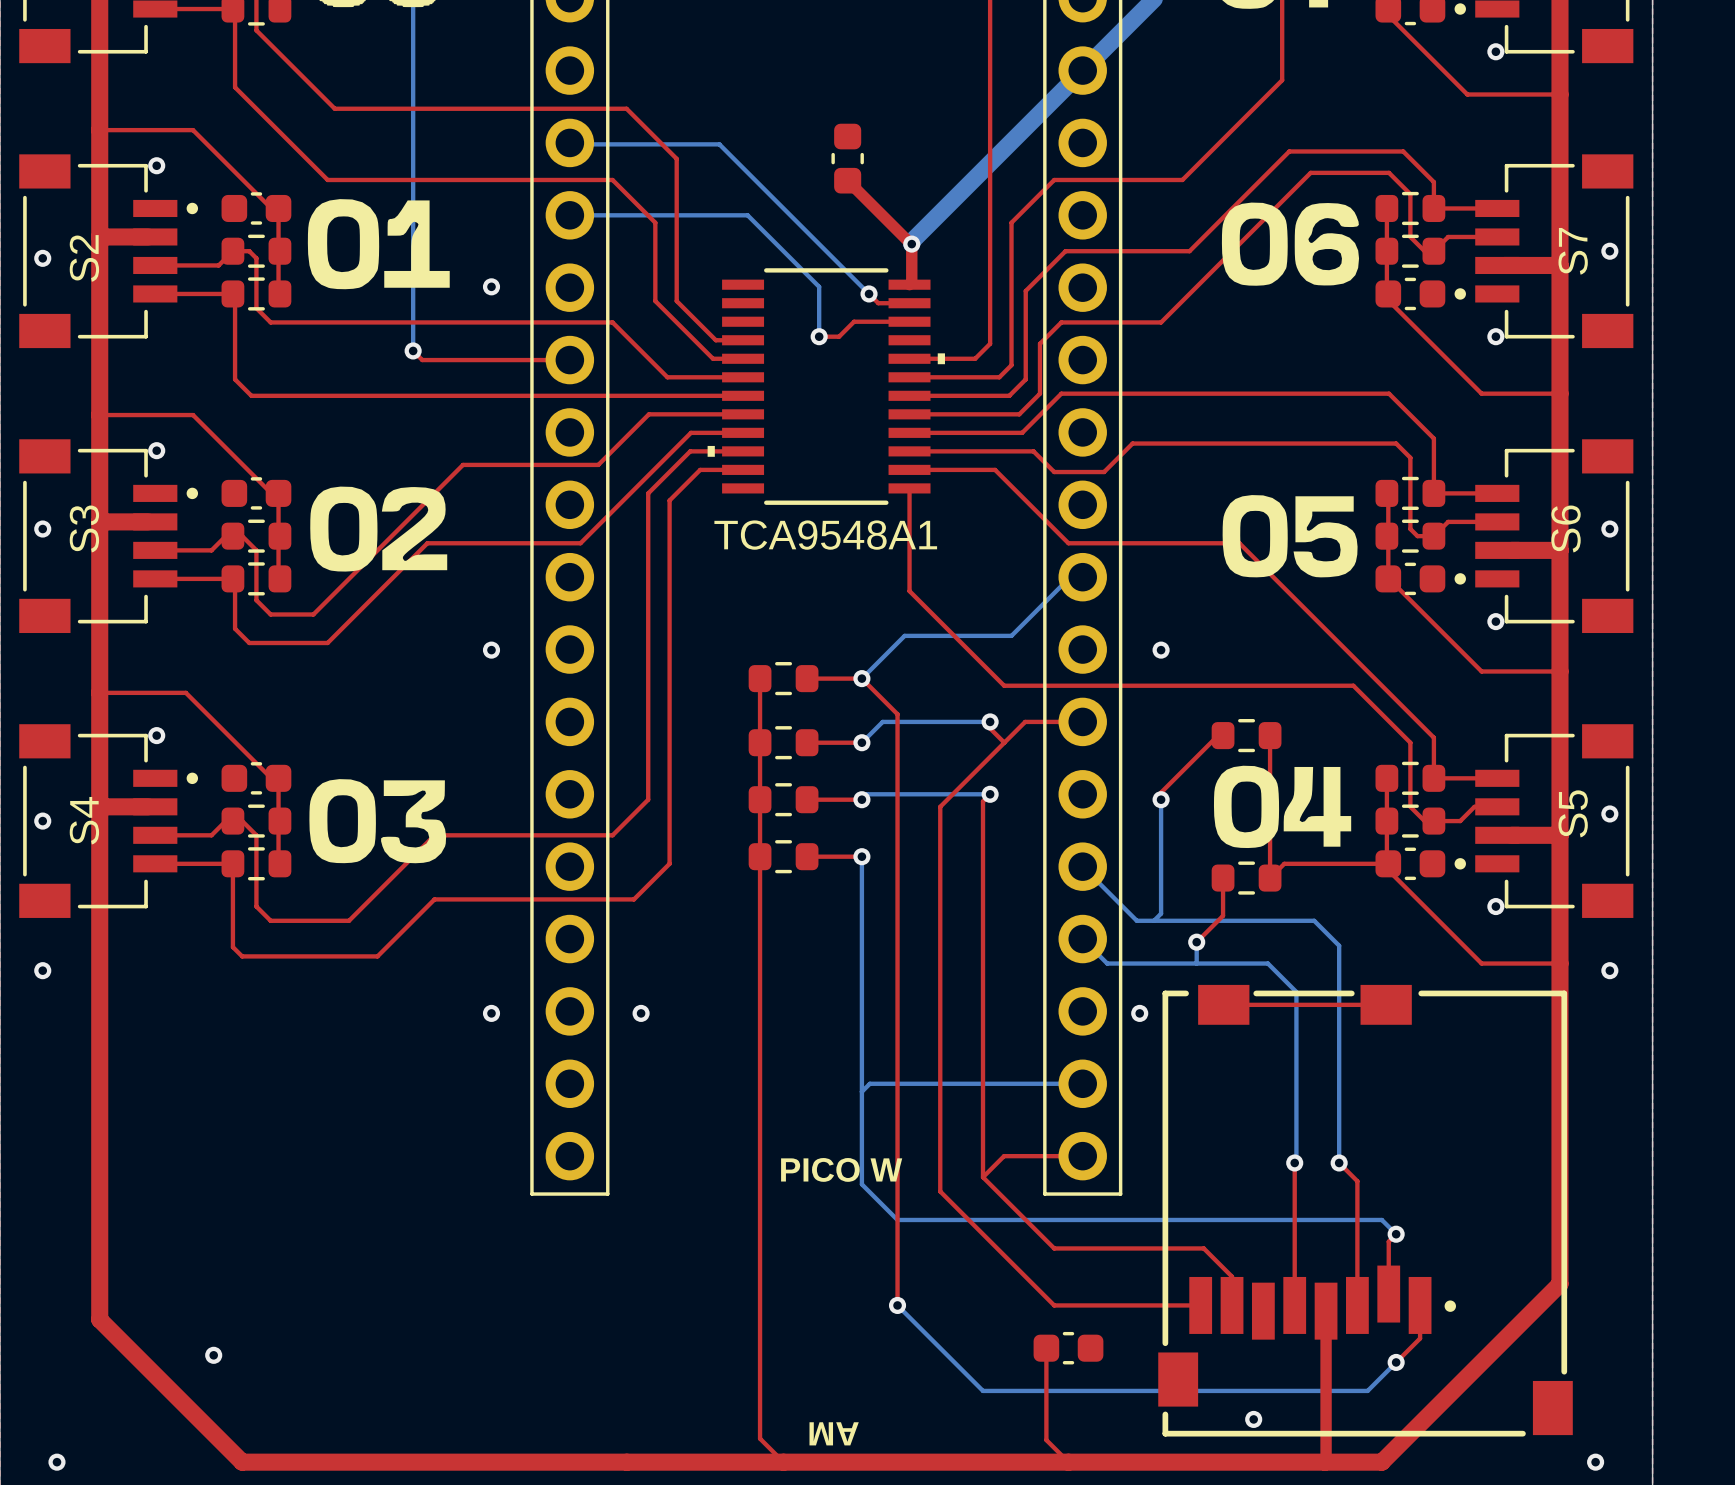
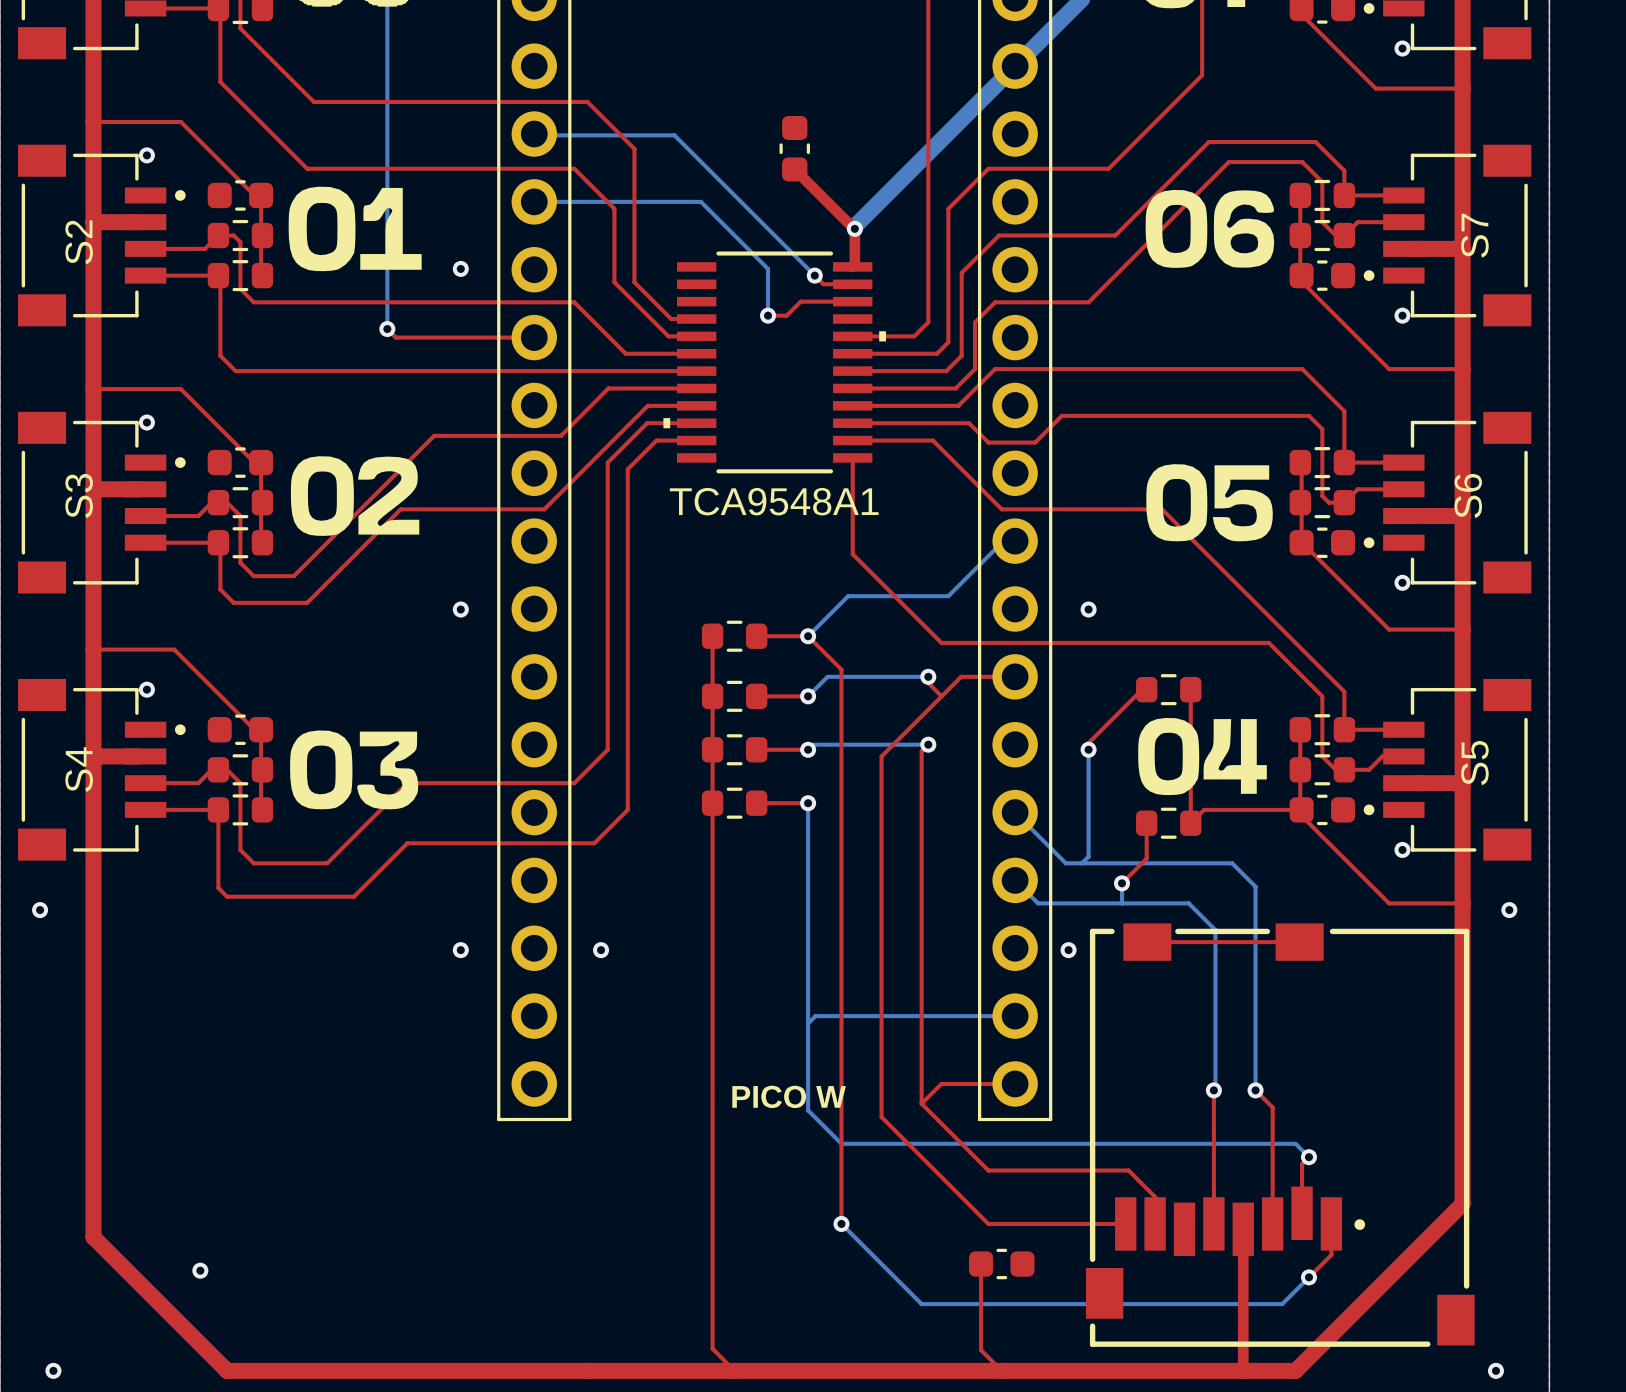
via: (1609, 251) -> none
via: (42, 258) -> none
via: (42, 529) -> none
via: (1609, 529) -> none
via: (1609, 813) -> none
via: (42, 821) -> none
via: (1253, 1419) -> none
text: AM (834, 1433) -> none

